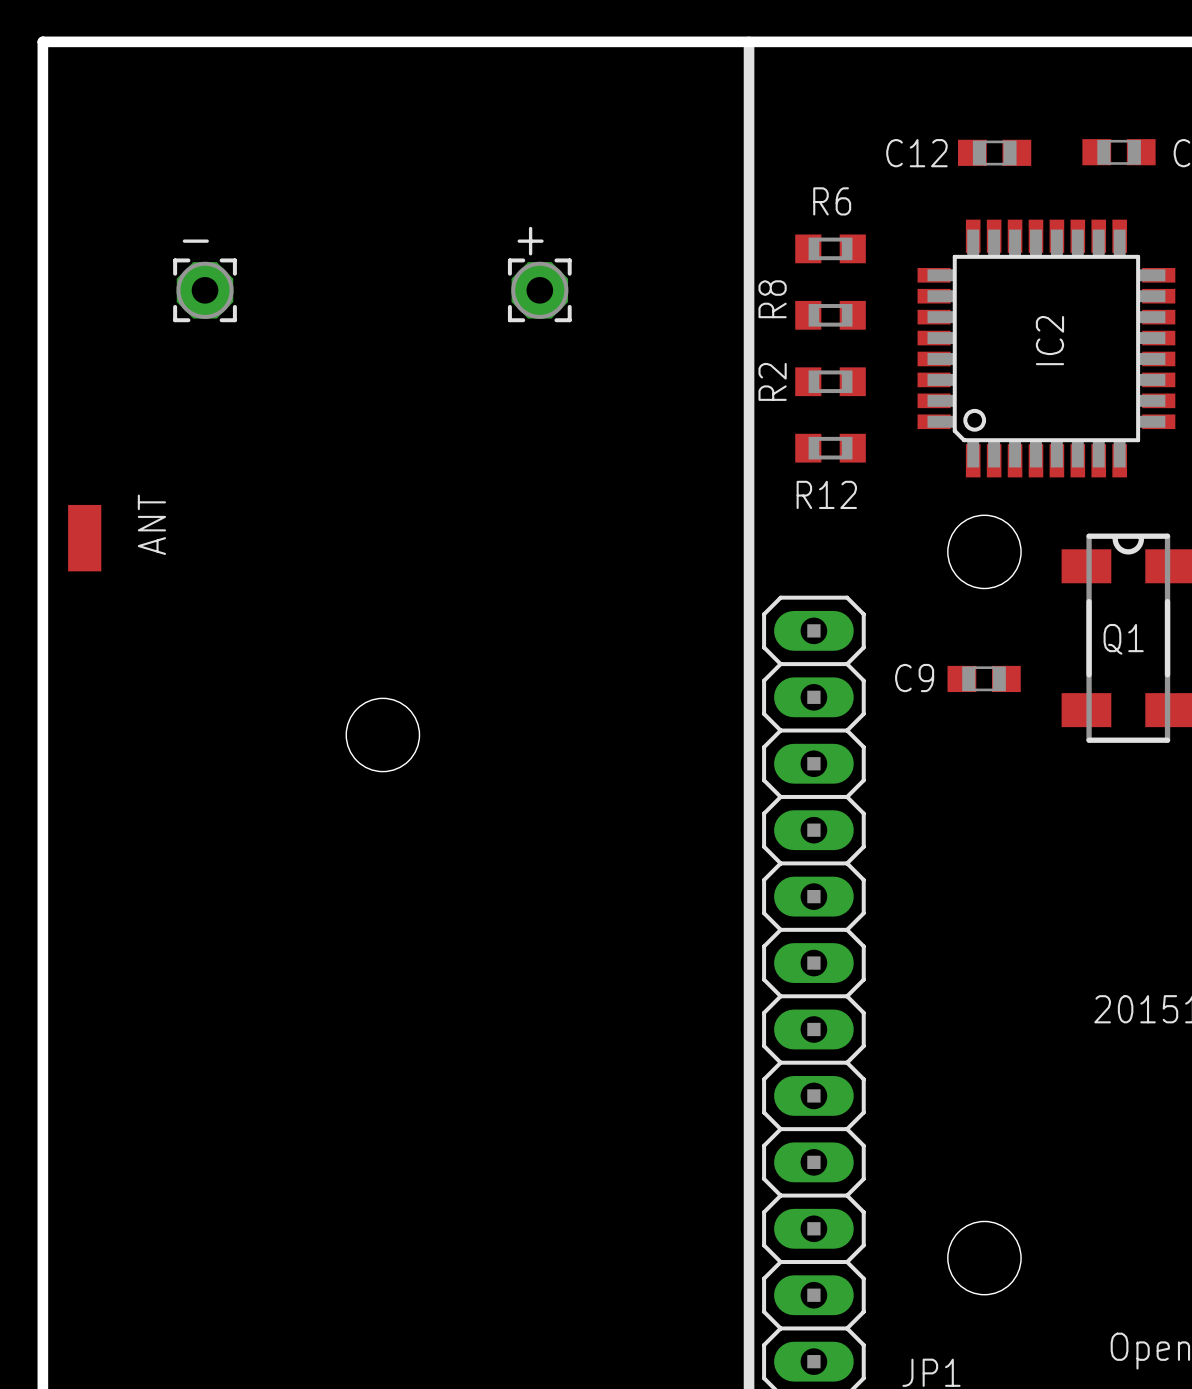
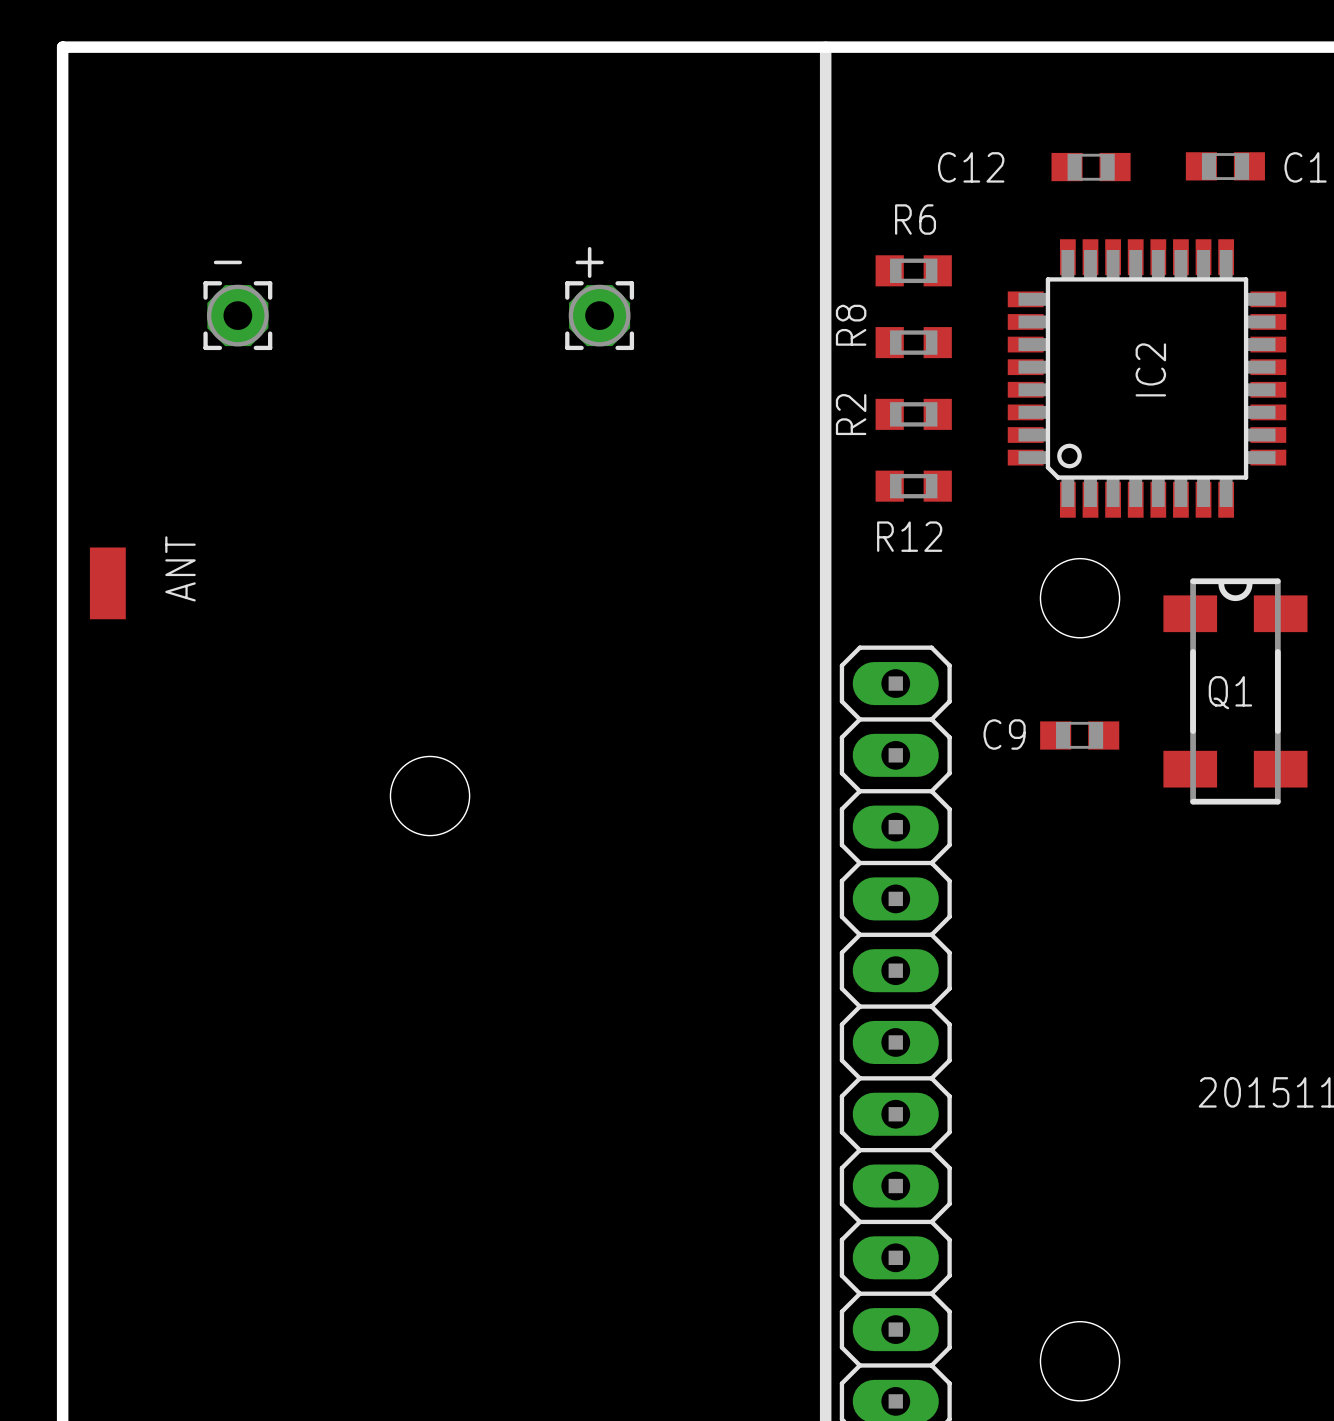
C12 name position: C12 (916, 153) -> C12 (971, 167)

